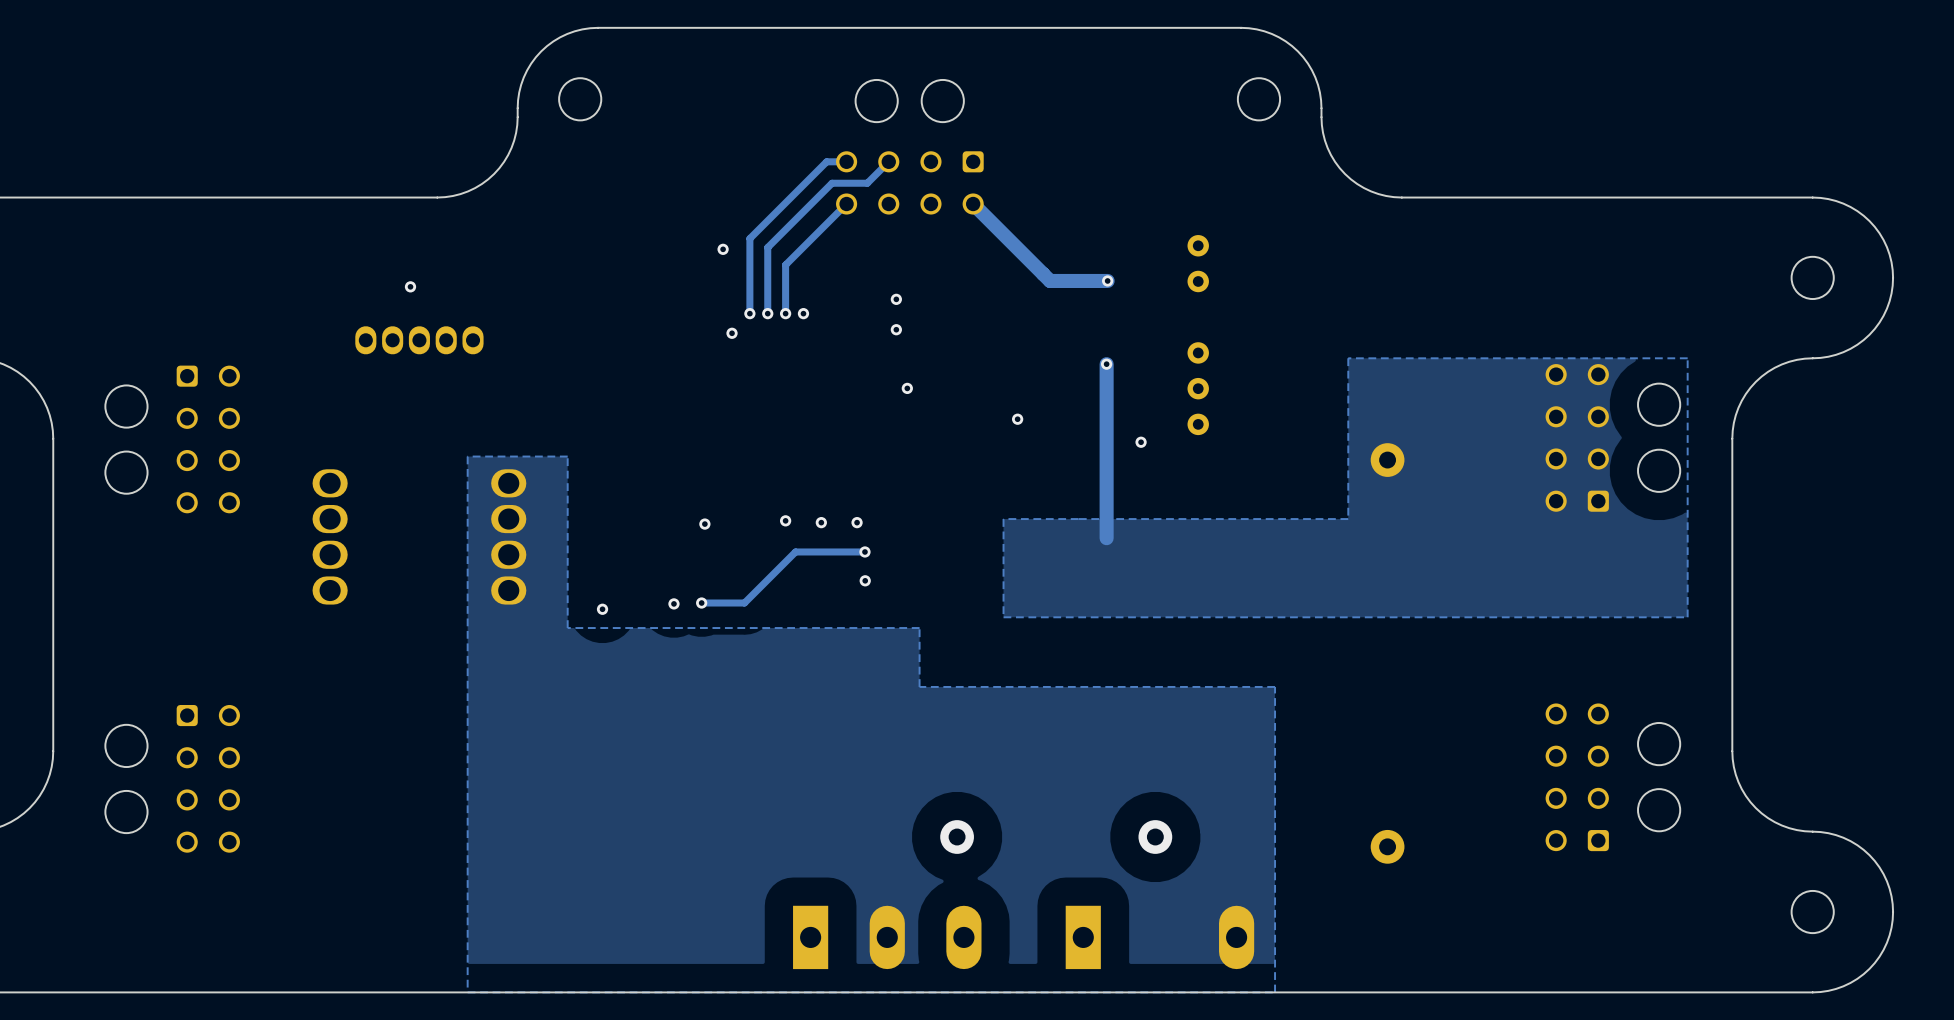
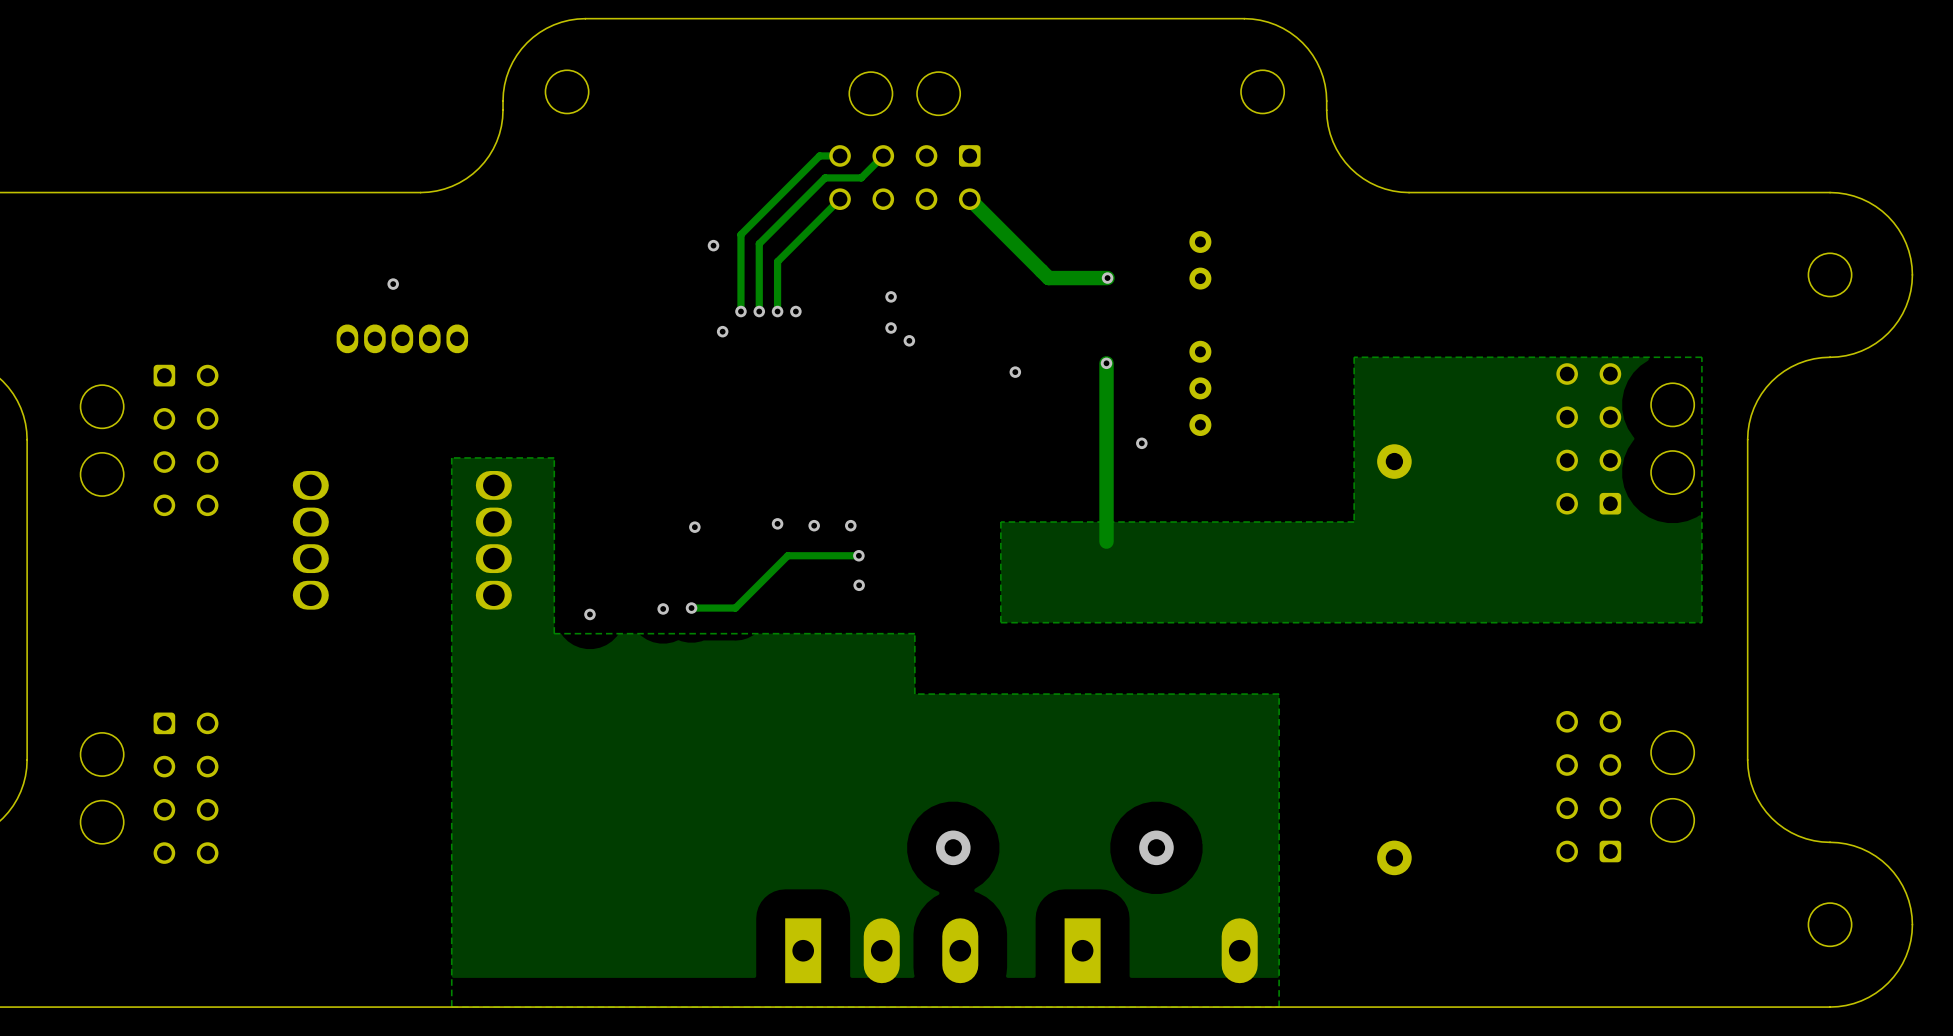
via position: (907, 388) -> (909, 340)
via position: (1017, 419) -> (1015, 372)

